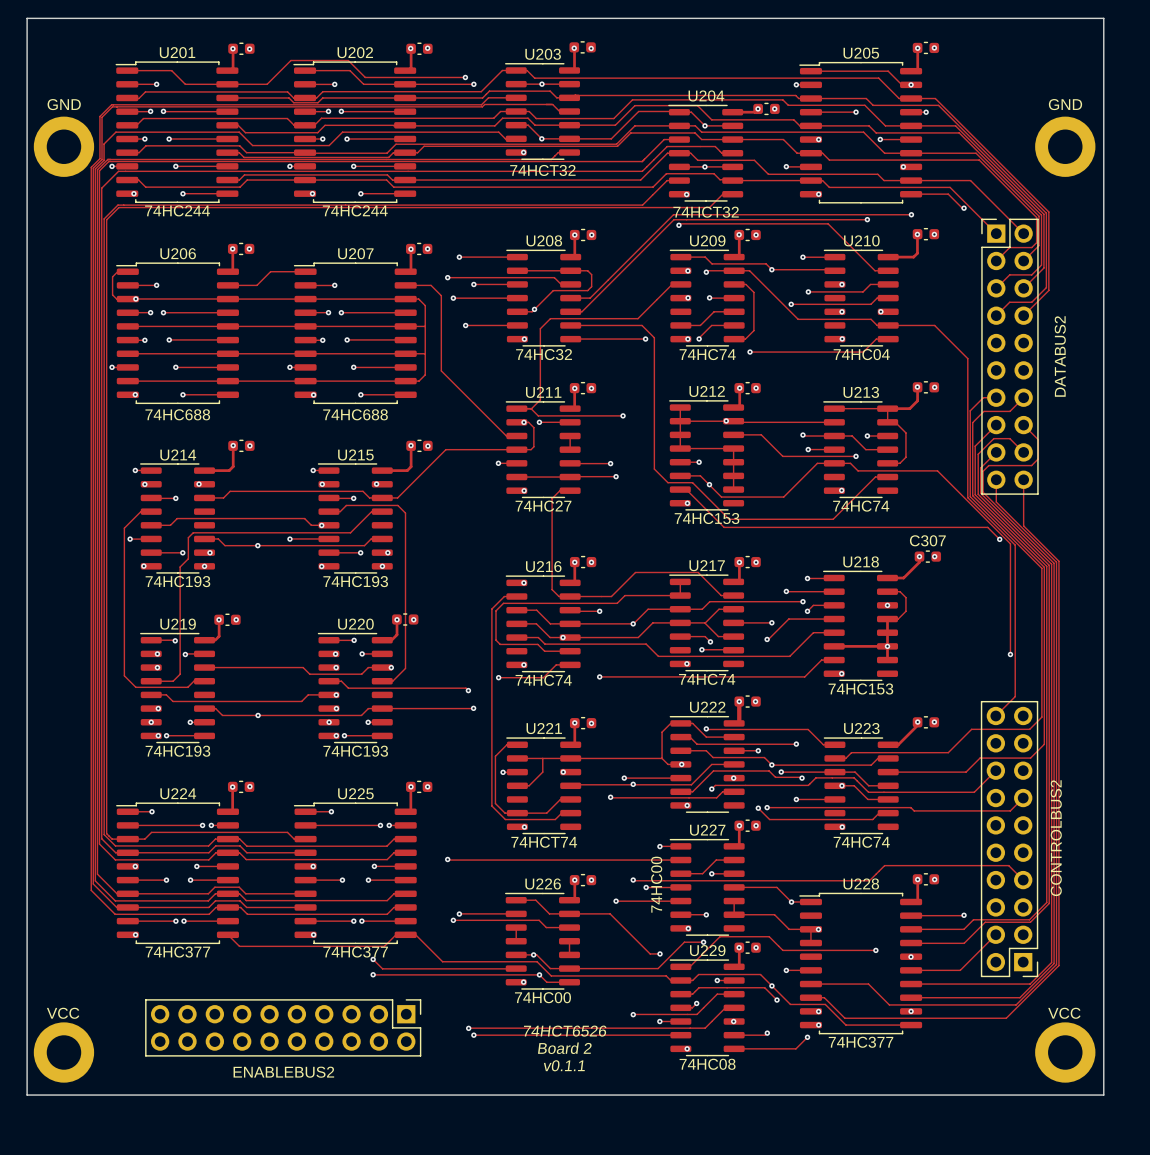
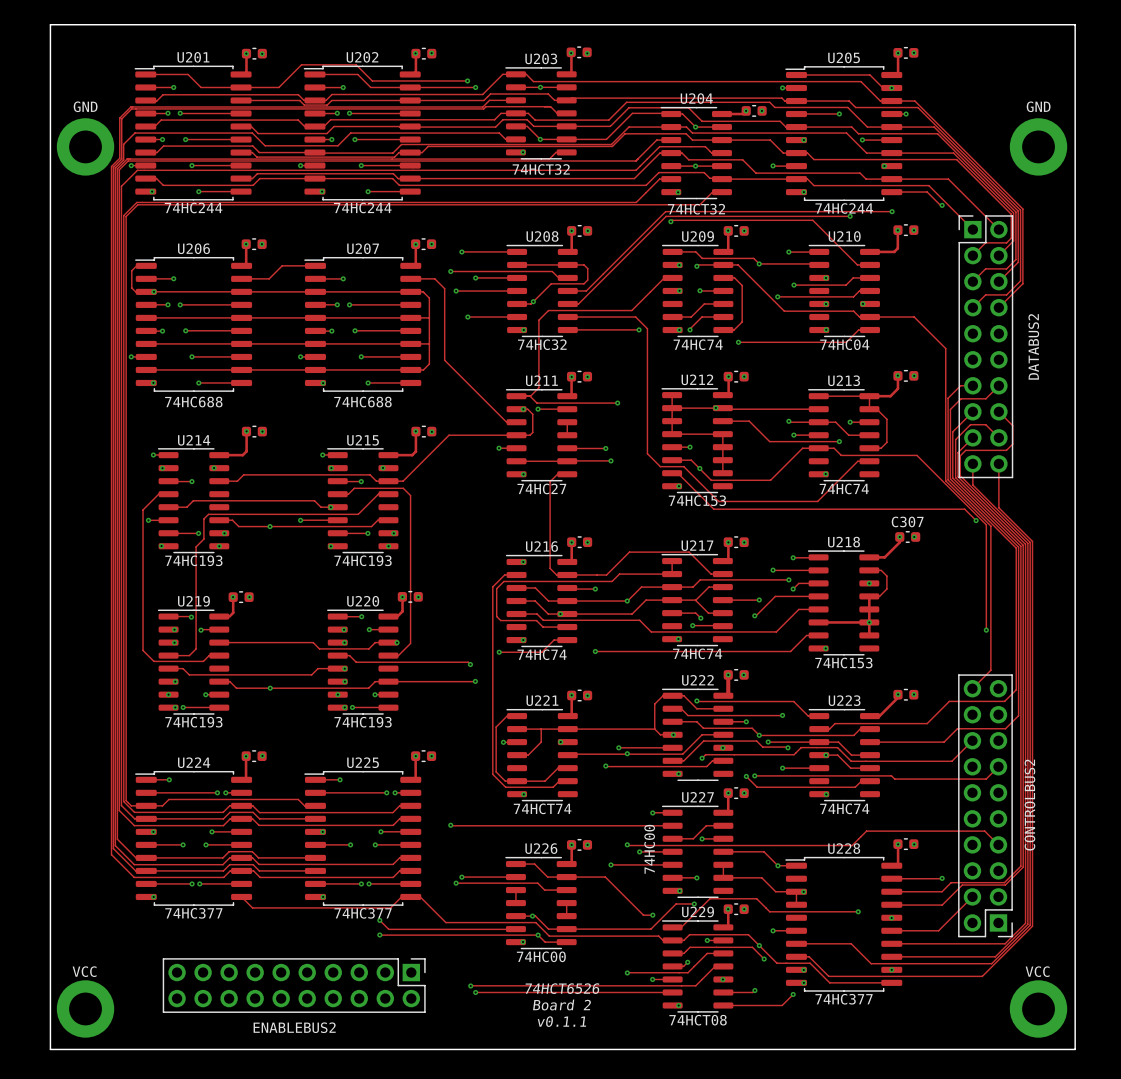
U205 value: none -> 74HC244 (844, 208)
U229 value: 74HC08 (707, 1064) -> 74HCT08 (698, 1020)

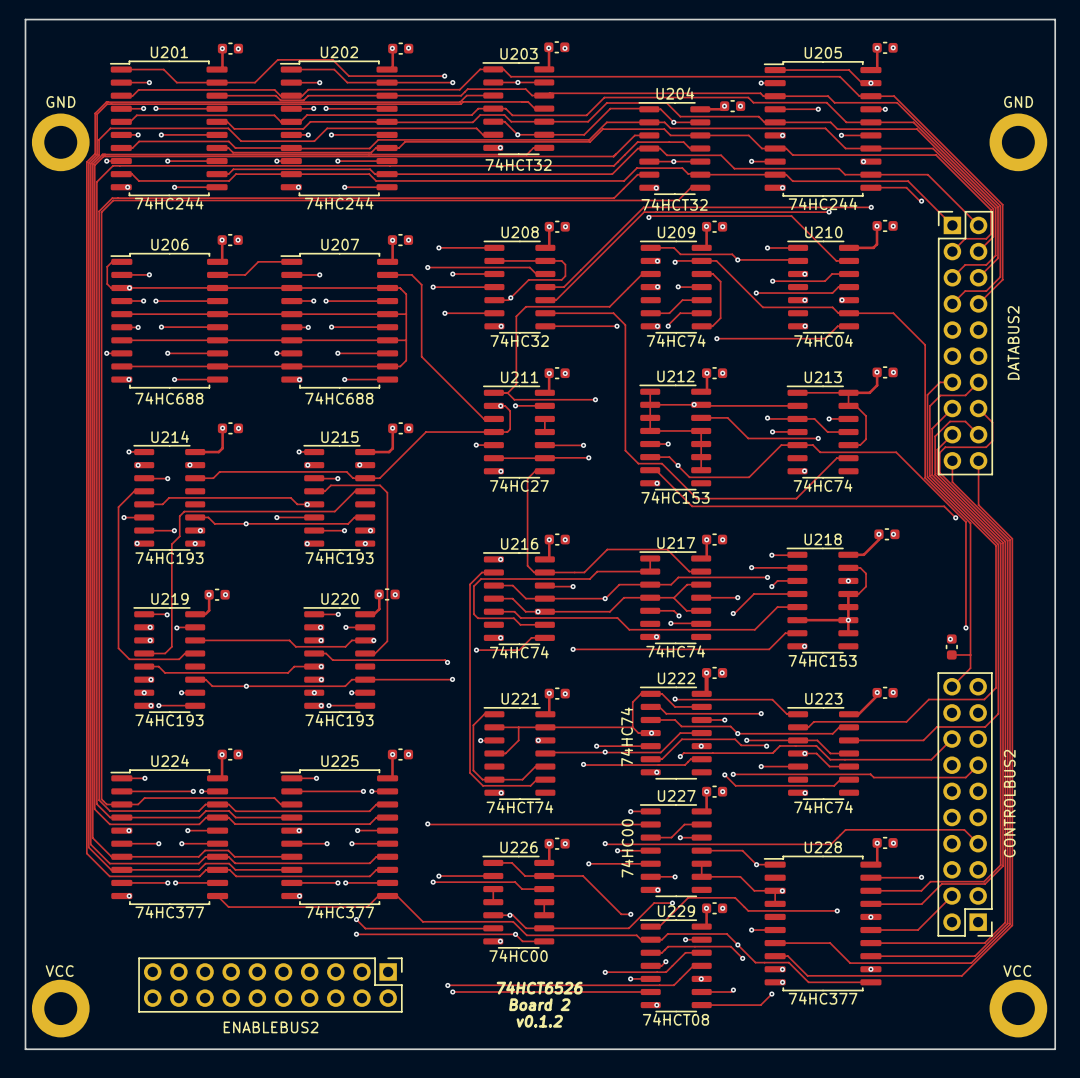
C307 name: C307 (907, 521) -> none
via: none -> (950, 639)
part: none -> (951, 646)
track: none -> (951, 654) (970, 654)
U222 value: none -> 74HC74 (626, 736)
text: v0.1.1 (561, 1021) -> v0.1.2 (539, 1021)

